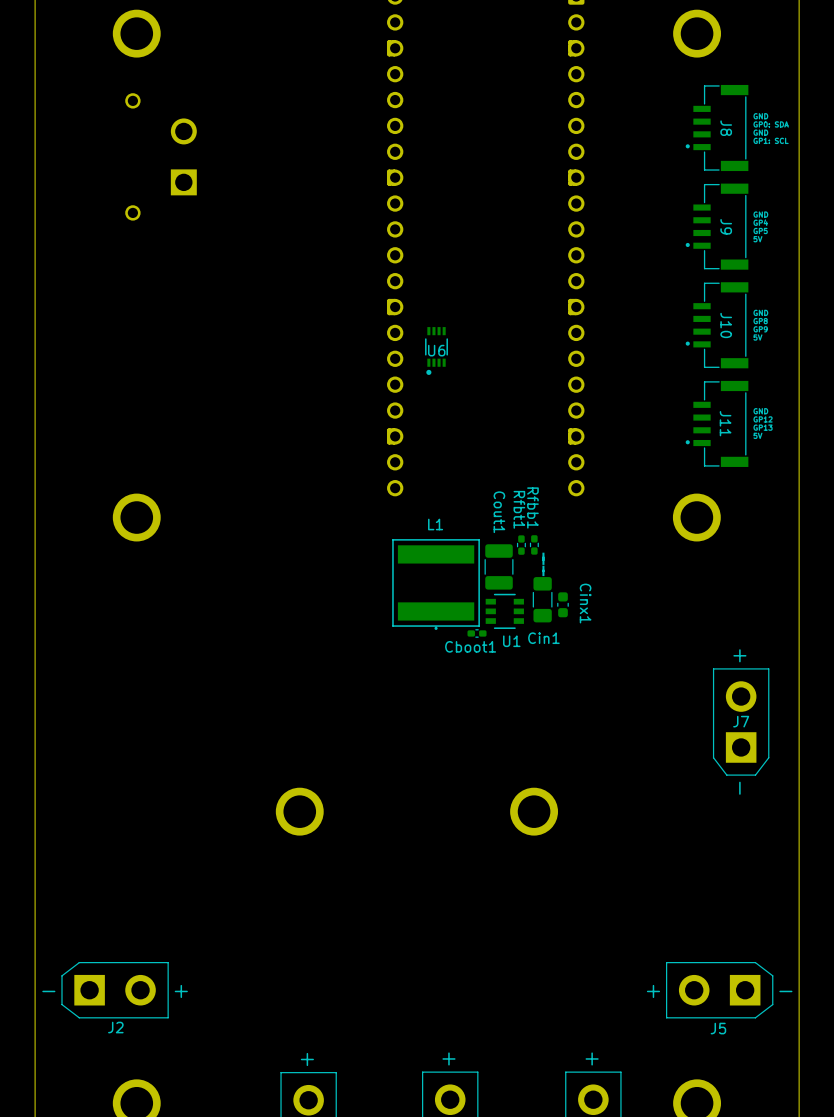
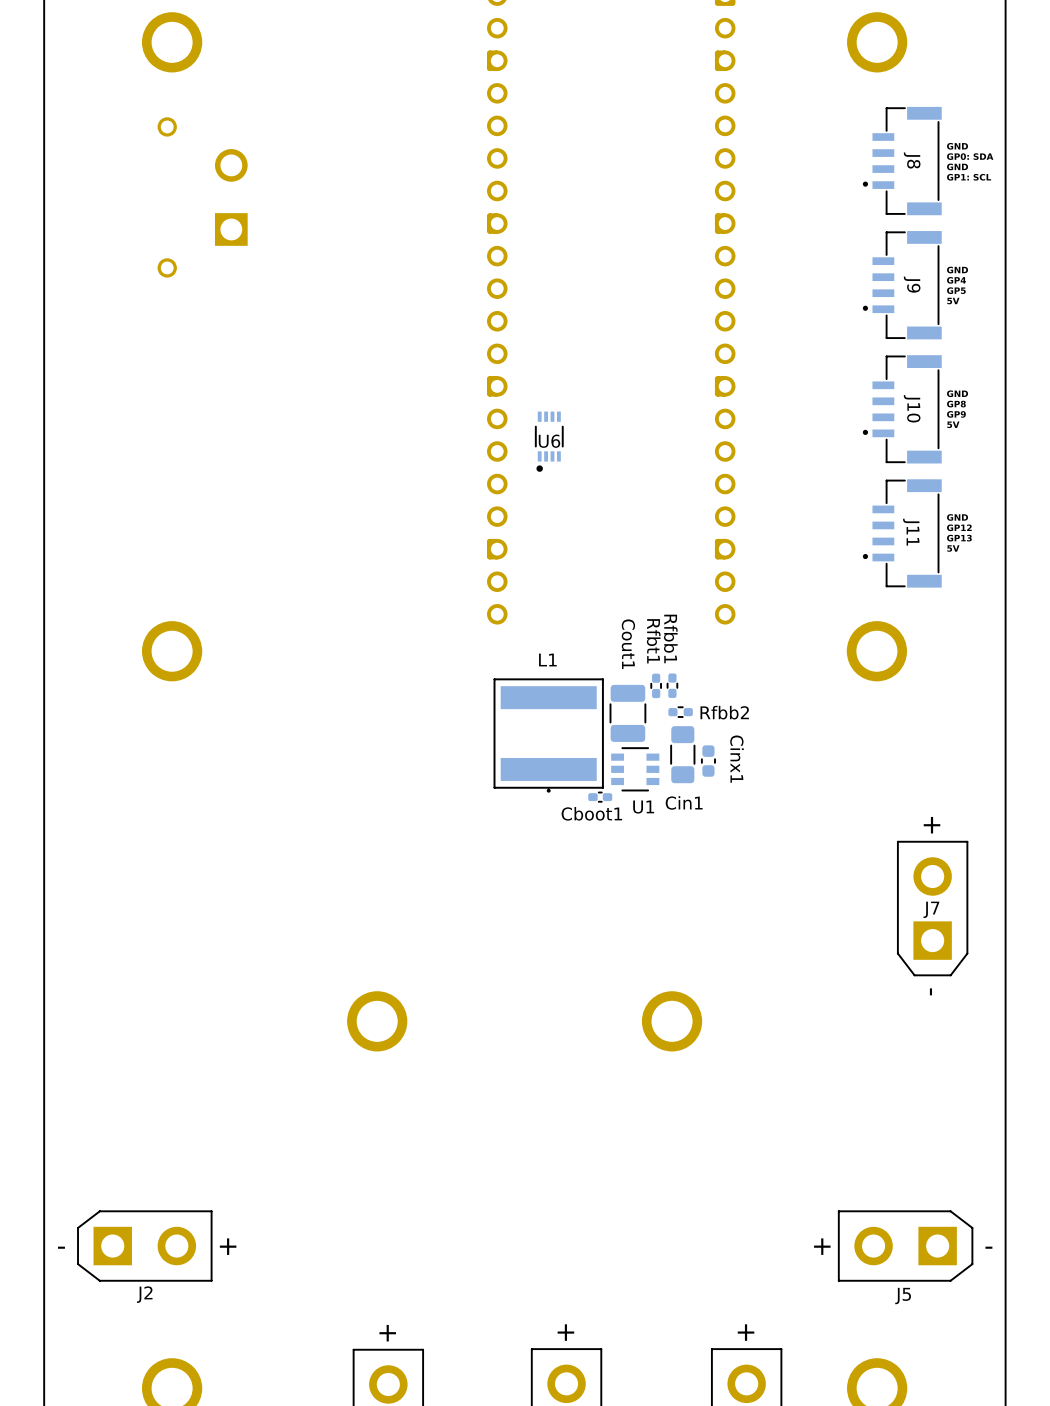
line: (543, 552) (543, 576) -> none
Rfbb2: none -> (680, 712)

